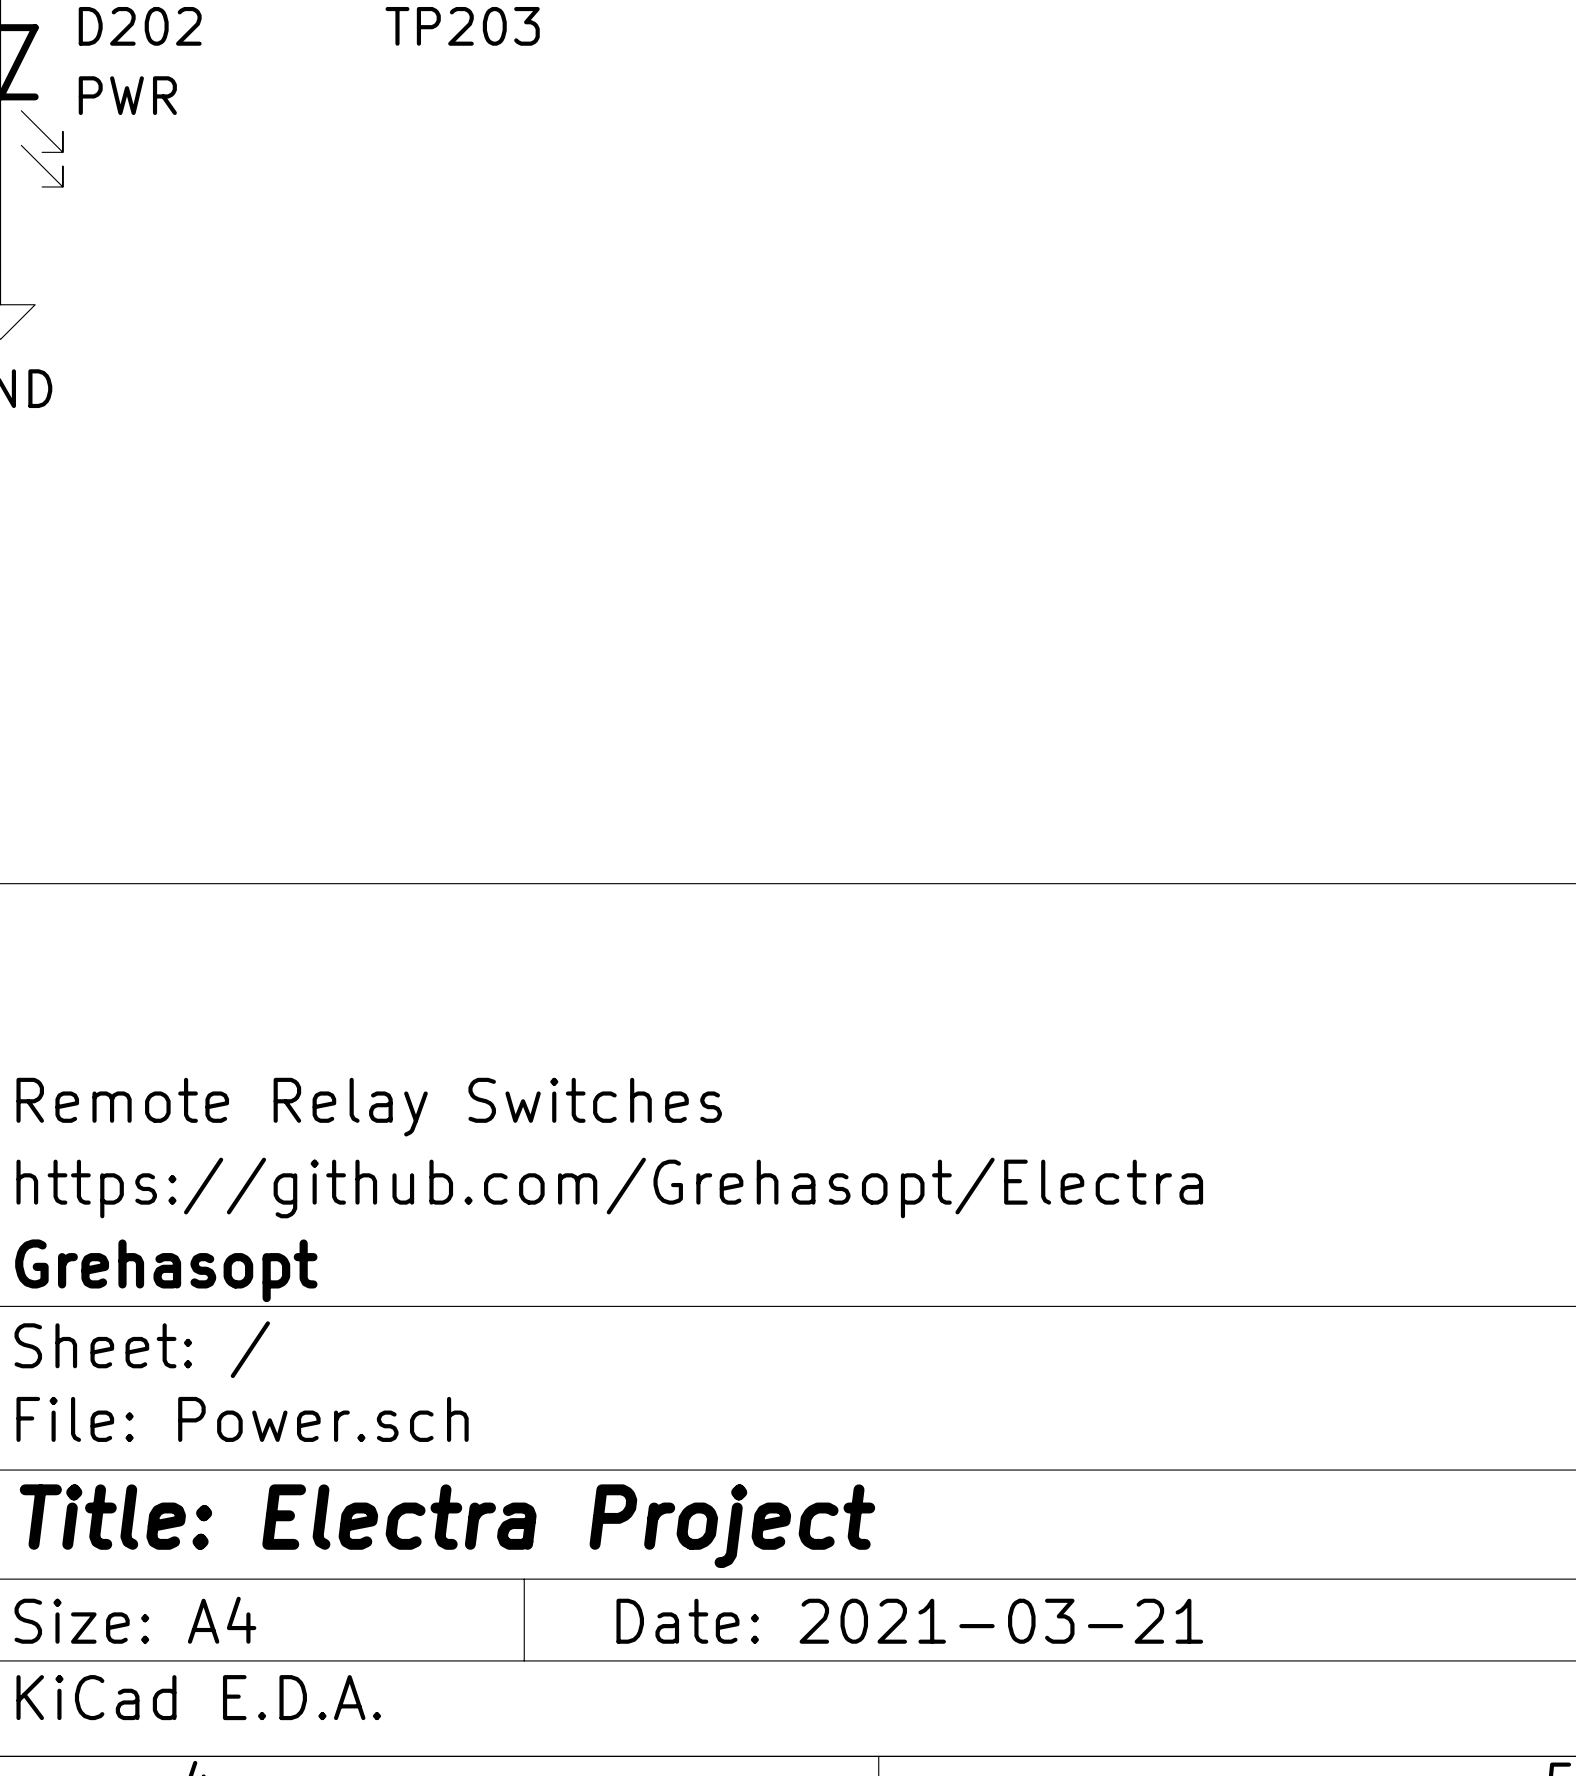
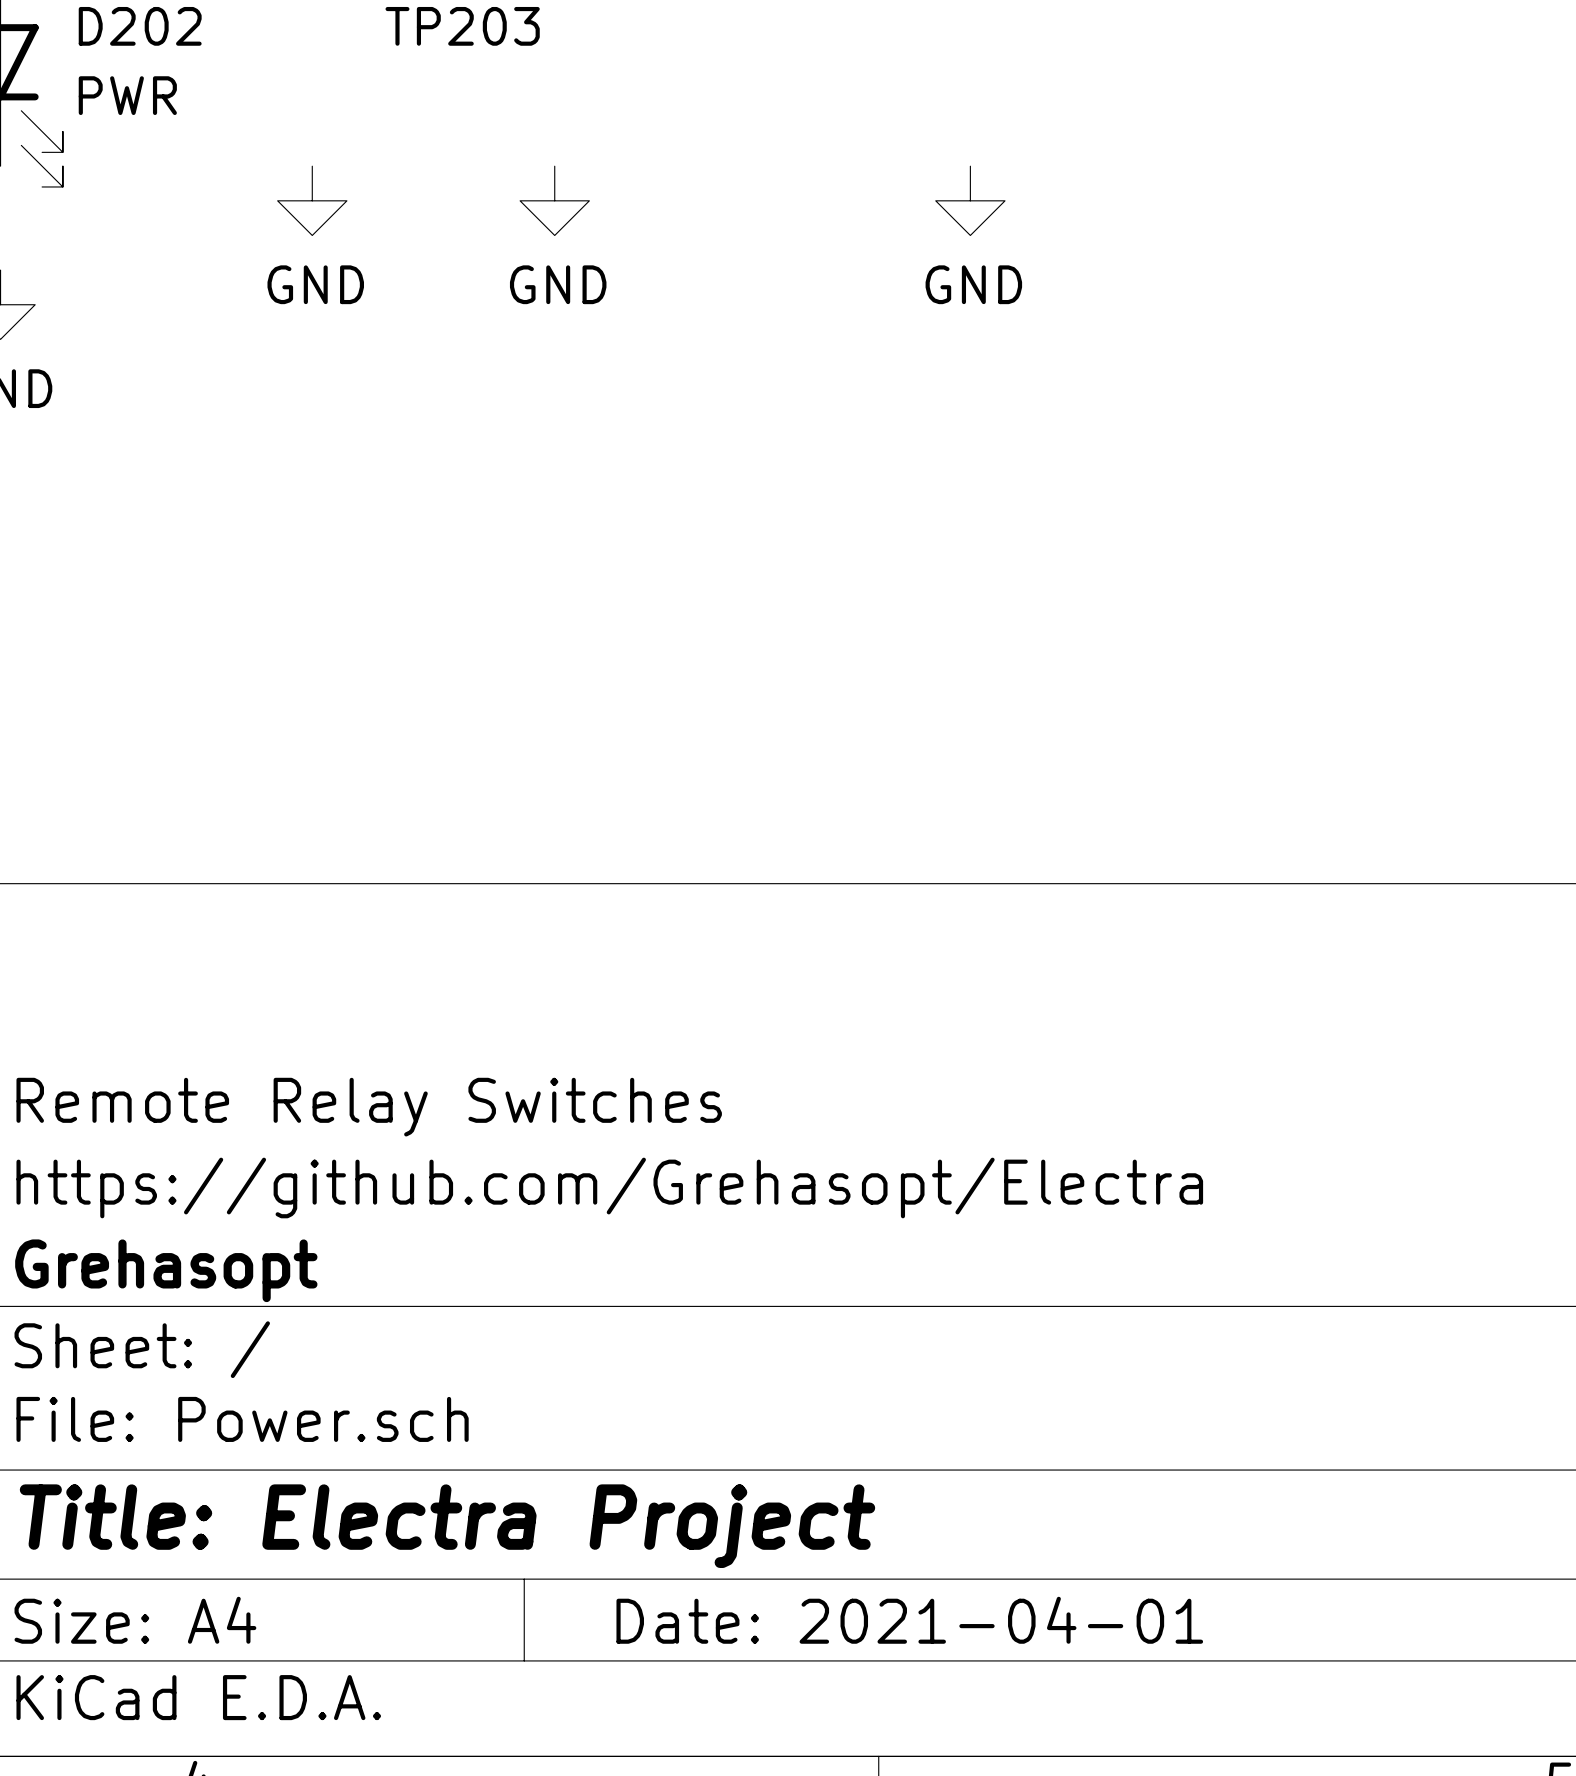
wire: (0, 166) (0, 270) -> none
power symbol: none -> GND (312, 200)
power symbol: none -> GND (554, 200)
power symbol: none -> GND (970, 200)
title block: Date: 2021-03-21 (909, 1621) -> Date: 2021-04-01 (909, 1620)

